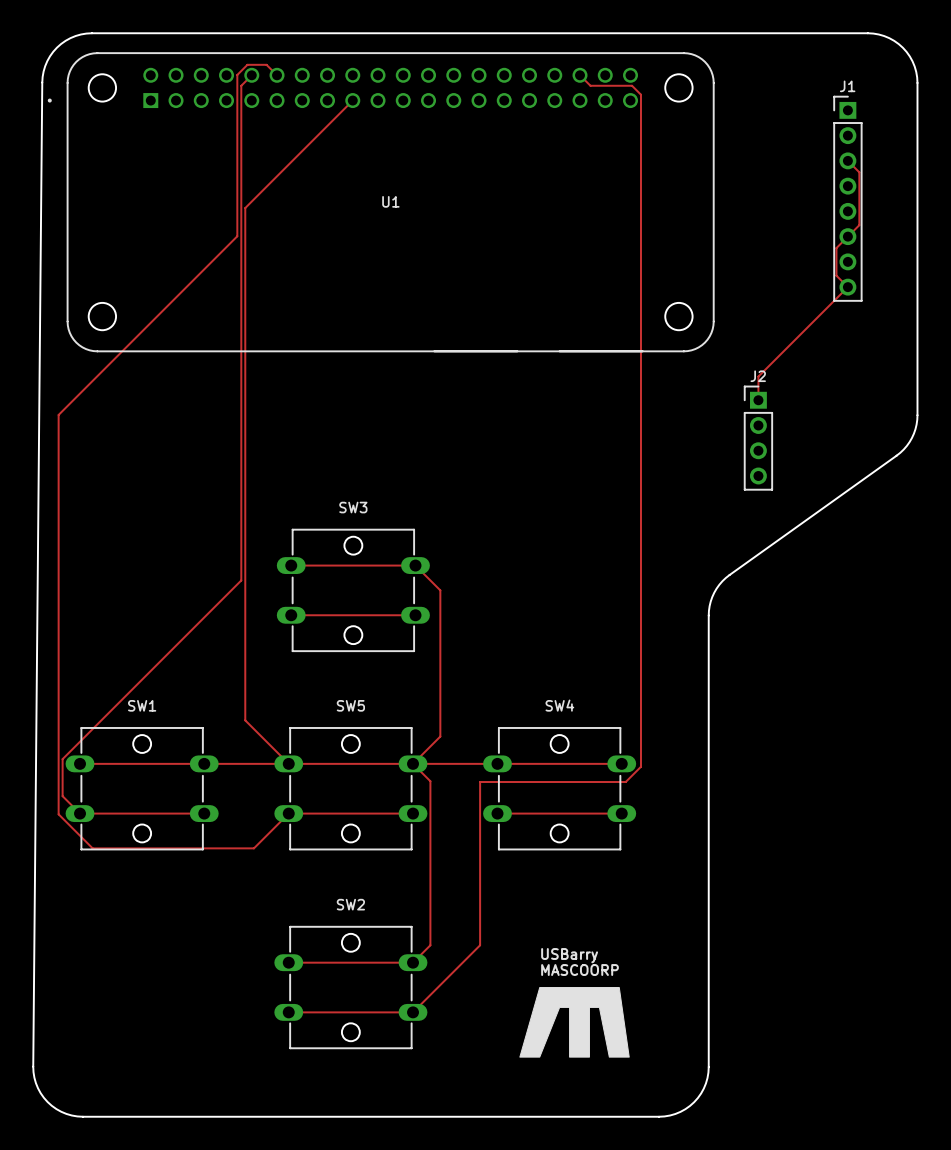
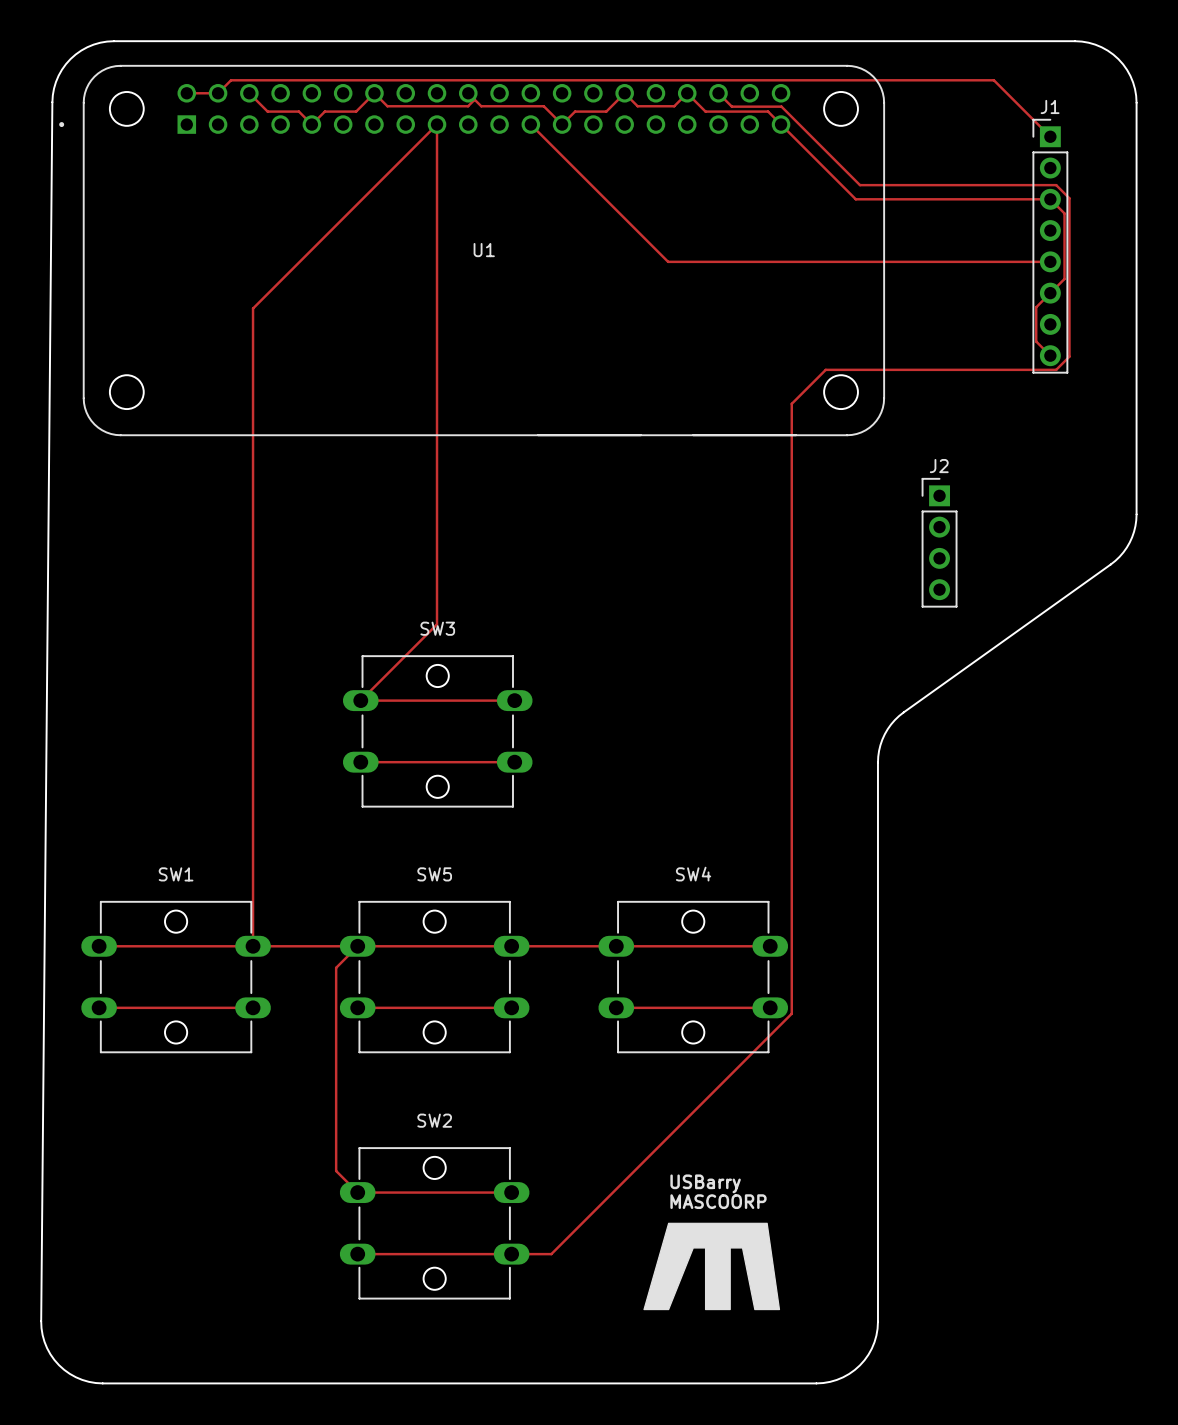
track: (247, 64) (237, 74) (237, 236) (58, 414) (58, 814) (92, 848) (253, 848) (288, 813) -> (306, 80) (231, 80) (218, 93) (186, 93)
track: (266, 64) (277, 75) -> (330, 80) (993, 80) (1050, 136)
track: none -> (249, 93) (267, 111) (298, 111) (311, 124) (324, 111) (356, 111) (374, 93) (387, 106) (468, 106) (474, 99)
track: (251, 75) (241, 85) (241, 580) (62, 759) (62, 796) (80, 813) -> none
track: none -> (468, 93) (481, 106) (543, 106) (562, 124) (575, 111) (606, 111) (624, 93) (637, 106) (674, 106) (687, 93) (705, 111) (768, 111) (855, 199) (1050, 199)
track: (590, 85) (632, 85) (640, 94) (640, 766) (625, 782) (480, 782) (480, 945) (413, 1012) -> (731, 106) (781, 106) (860, 185) (1056, 185) (1069, 198) (1069, 356) (1056, 369) (825, 369) (791, 403) (791, 1013) (551, 1254) (511, 1254)
track: none -> (437, 124) (437, 624) (360, 700)
track: none -> (530, 124) (668, 261) (1050, 261)
track: (245, 208) (245, 720) (288, 763) -> (303, 257) (253, 308) (253, 946)
track: (847, 287) (758, 376) (758, 400) -> none
track: (415, 565) (440, 590) (440, 736) (413, 763) (430, 781) (430, 945) (413, 962) -> none
track: none -> (357, 946) (336, 967) (336, 1171) (357, 1192)

